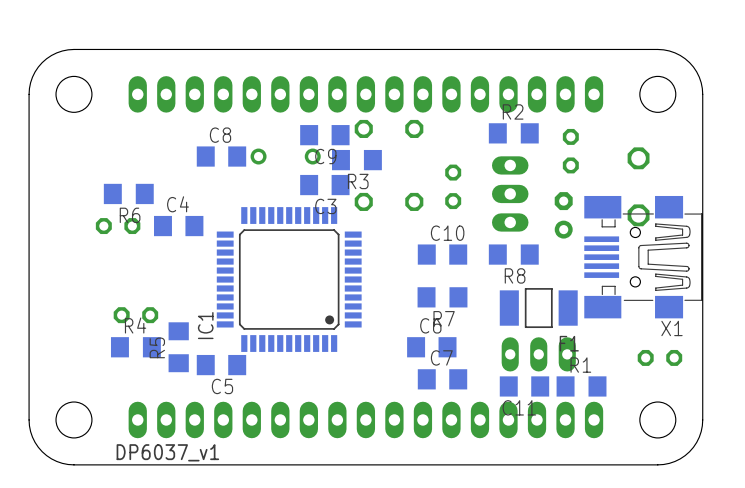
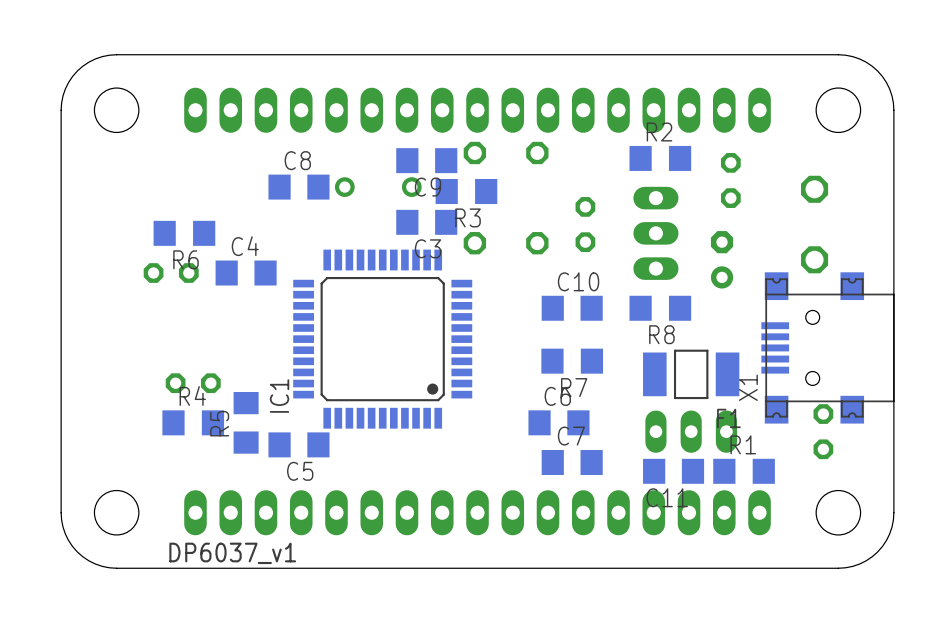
X1 footprint: [584, 195, 703, 319] -> [761, 272, 895, 424]
X1 name position: X1 (671, 328) -> X1 (748, 387)
part rotation: 0° (659, 357) -> 90° clockwise (823, 431)

